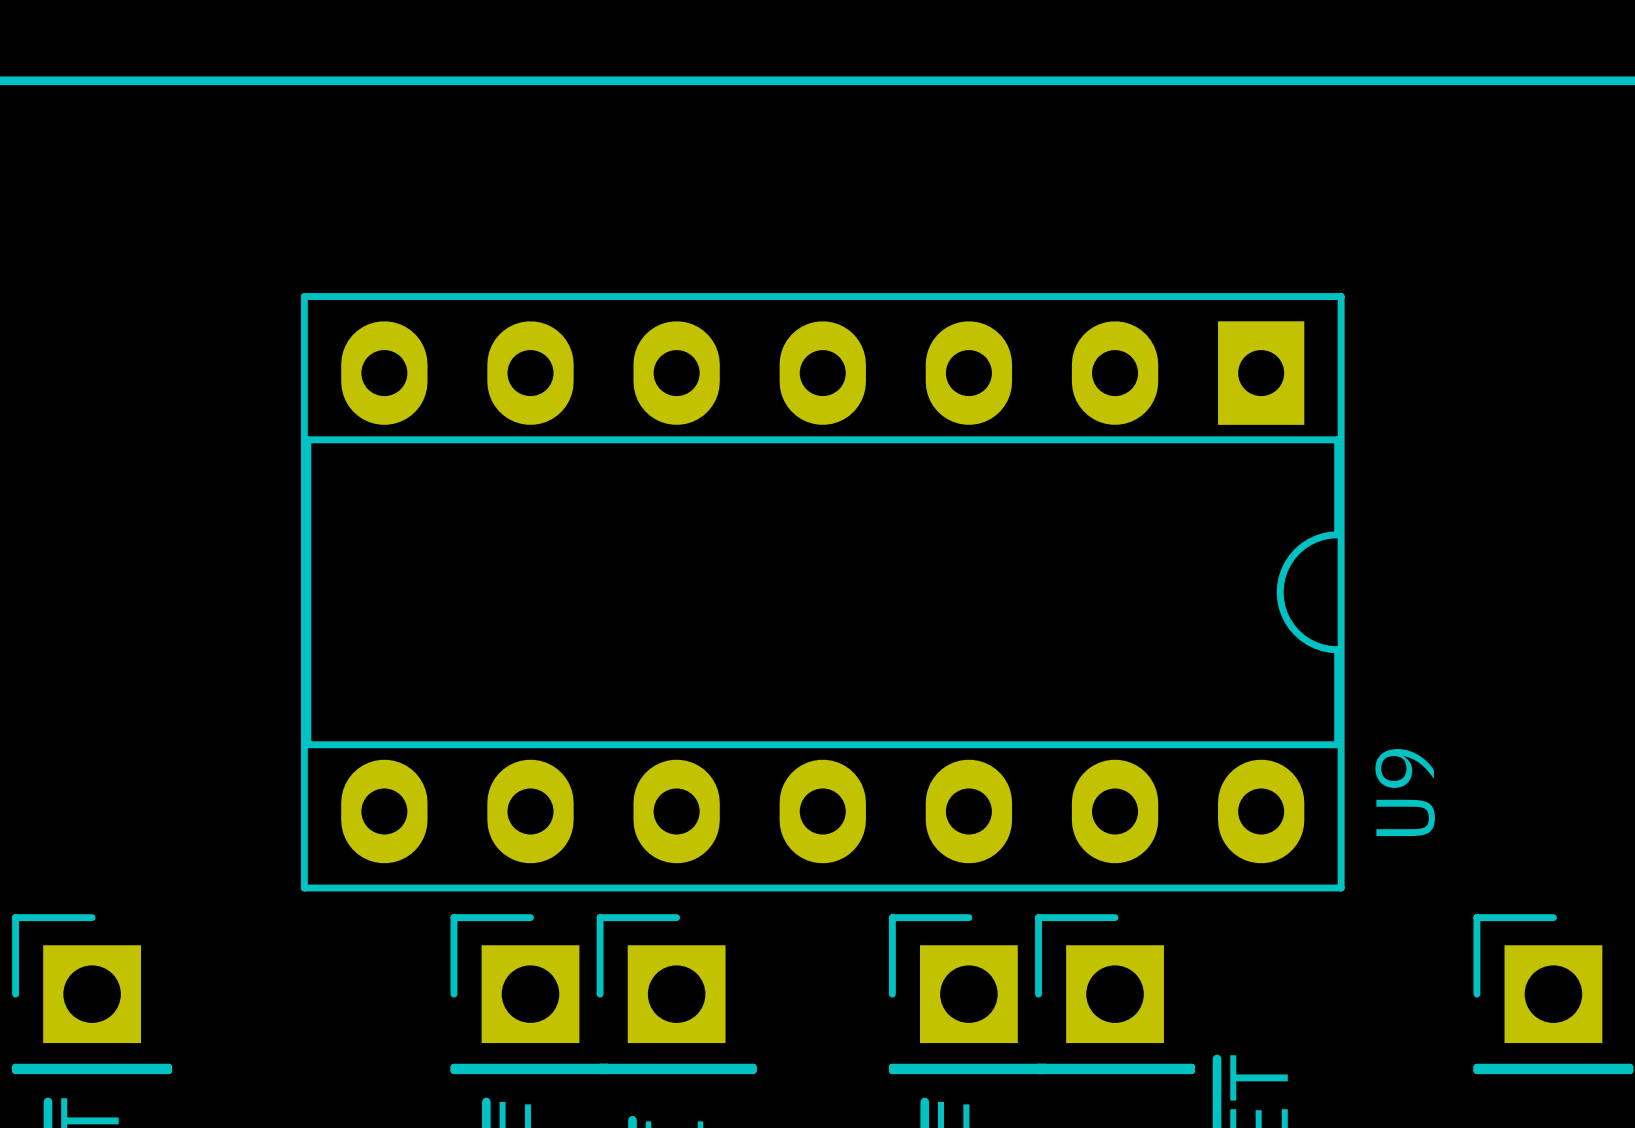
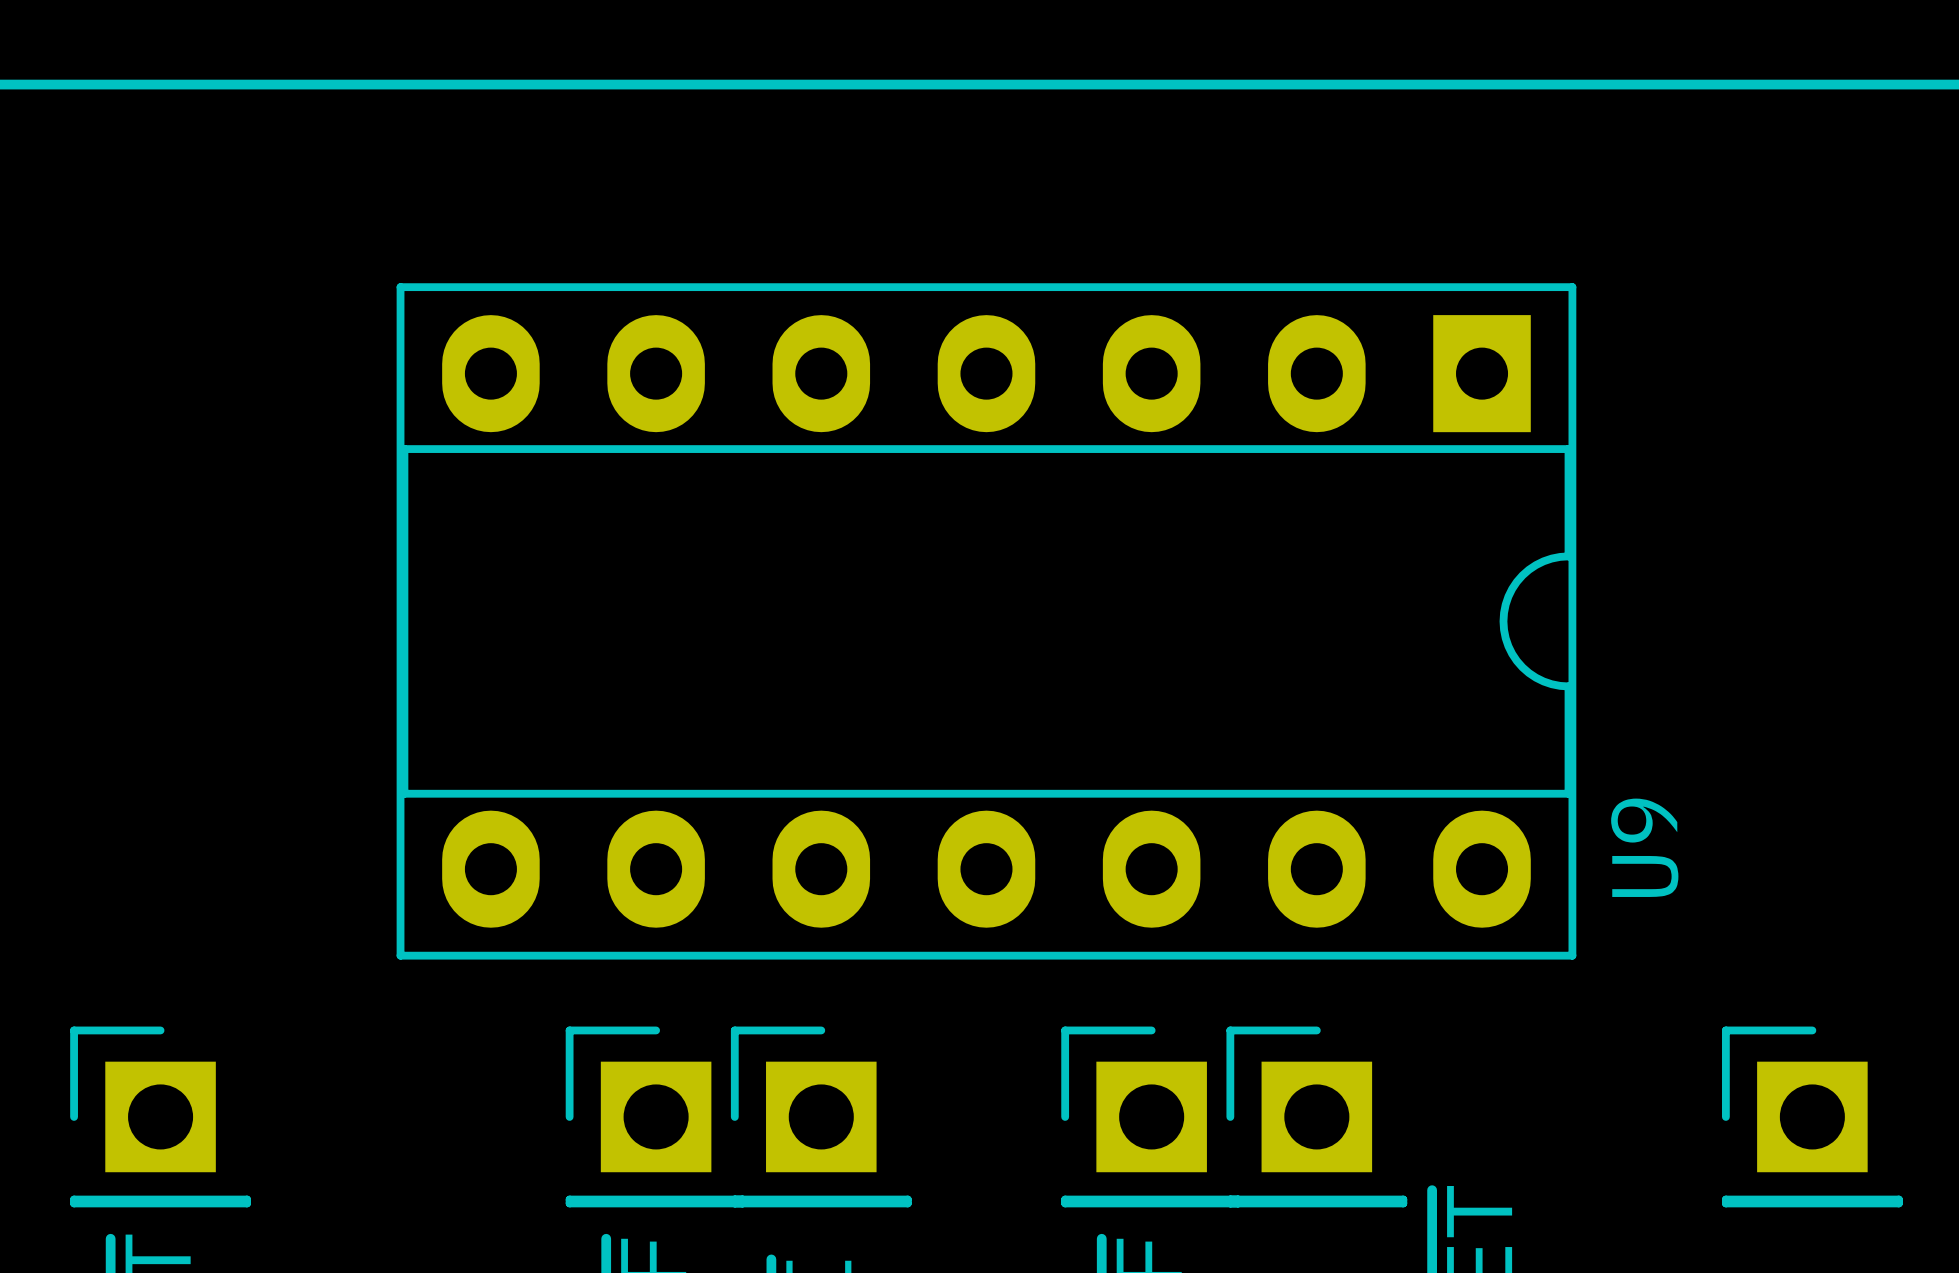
U9 position: (822, 592) -> (986, 621)

